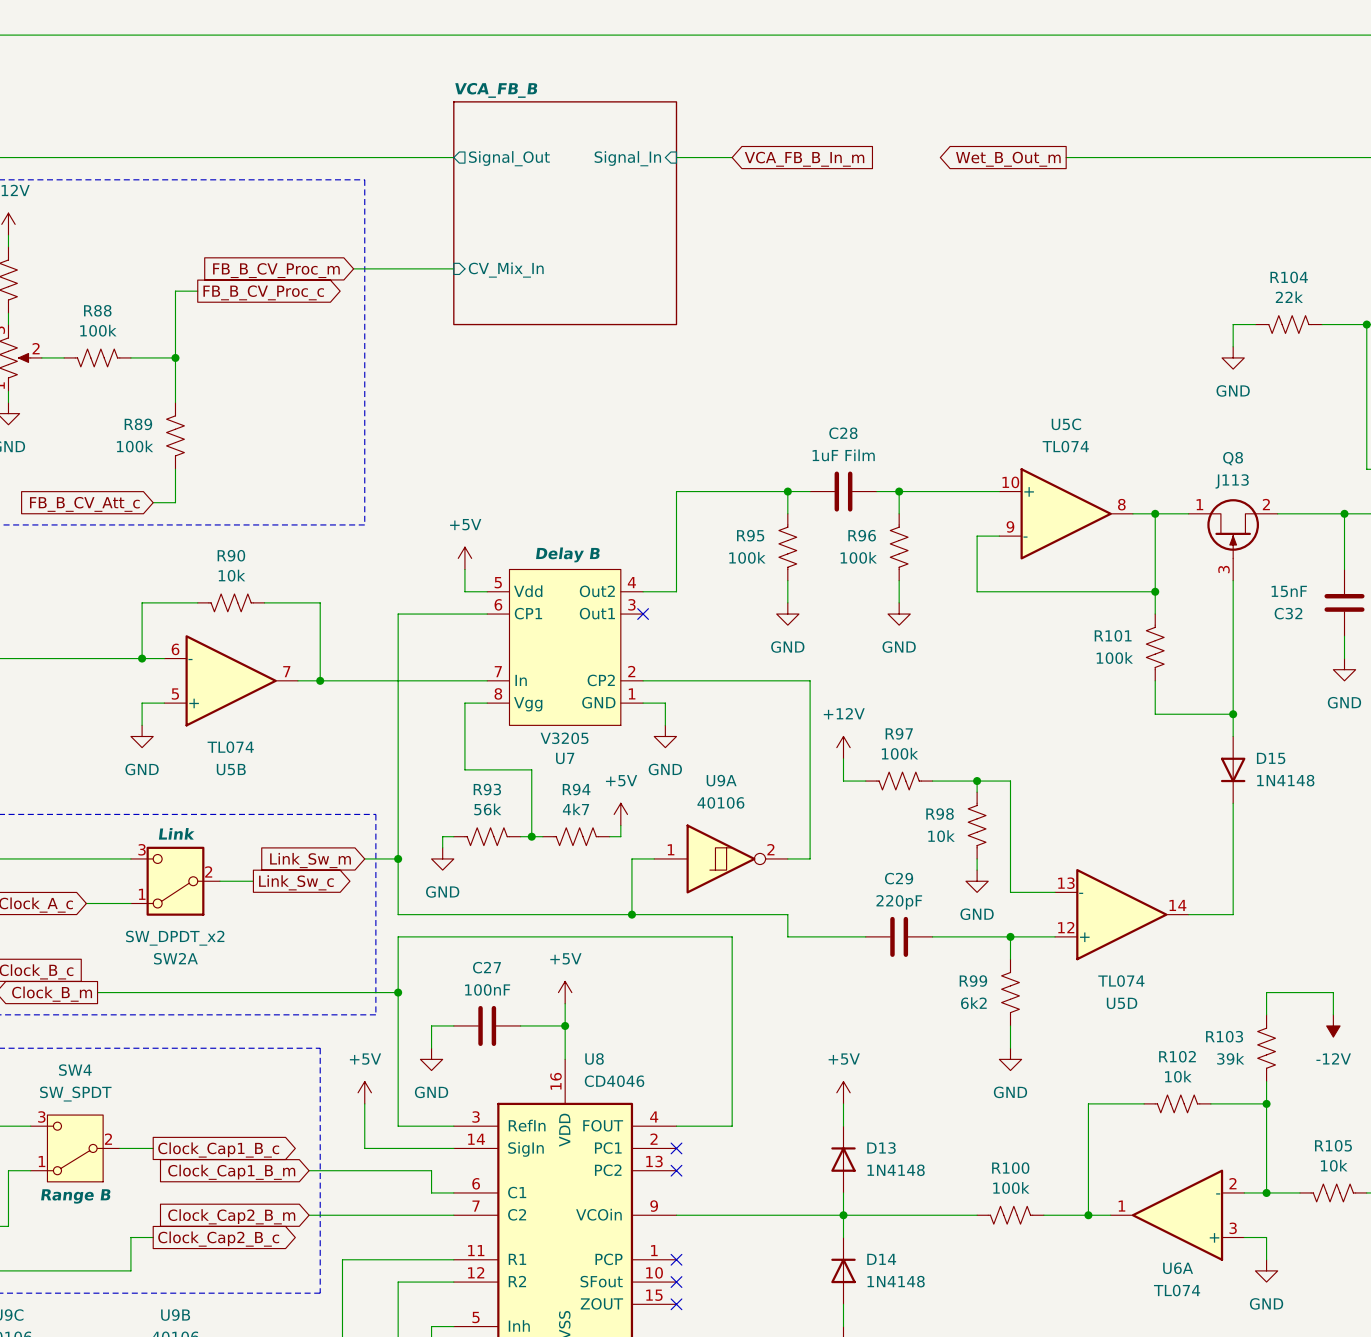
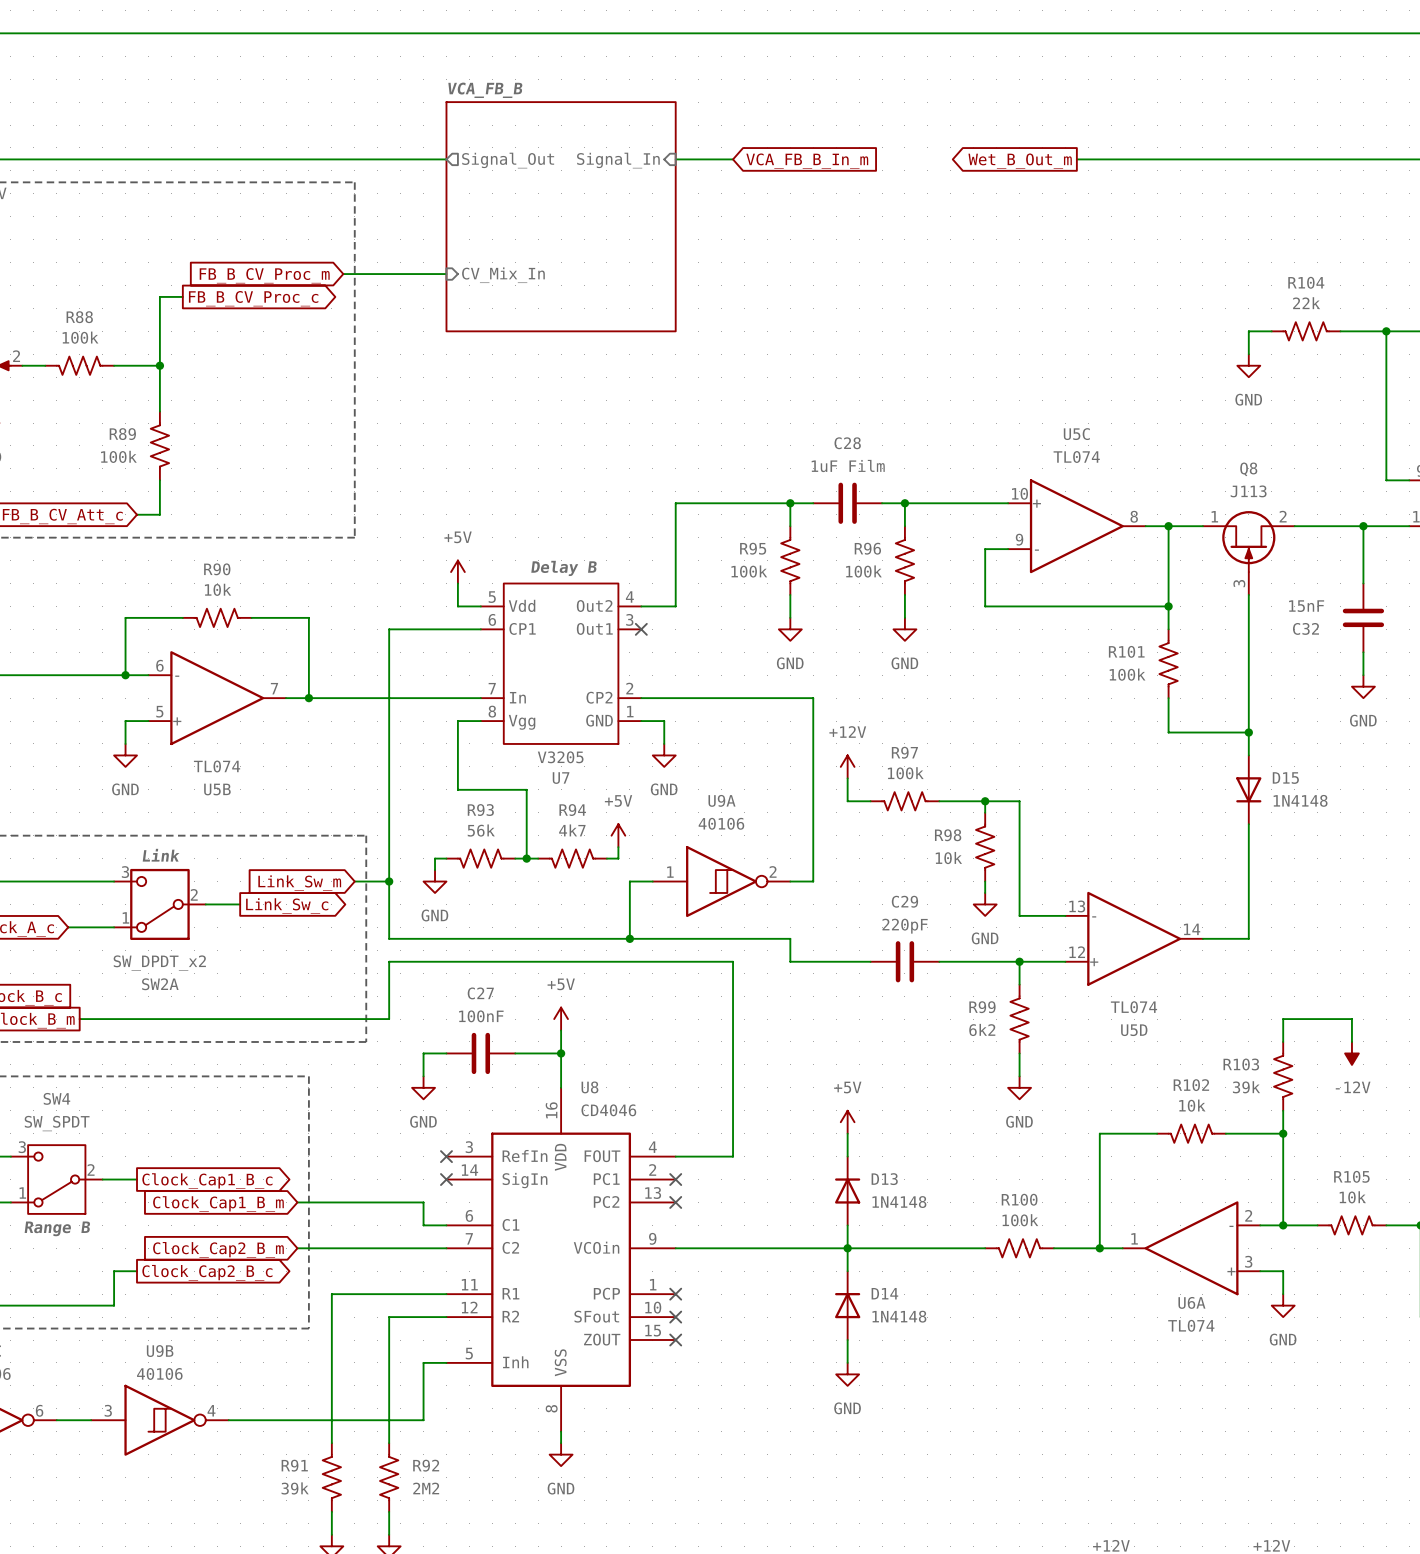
wire: (398, 992) (398, 1126) (453, 1126) -> none
junction: (398, 992) -> none
power symbol: +5V (364, 1092) -> none
wire: (364, 1103) (364, 1148) (453, 1148) -> none
no-connect mark: none -> (446, 1156)
no-connect mark: none -> (446, 1179)

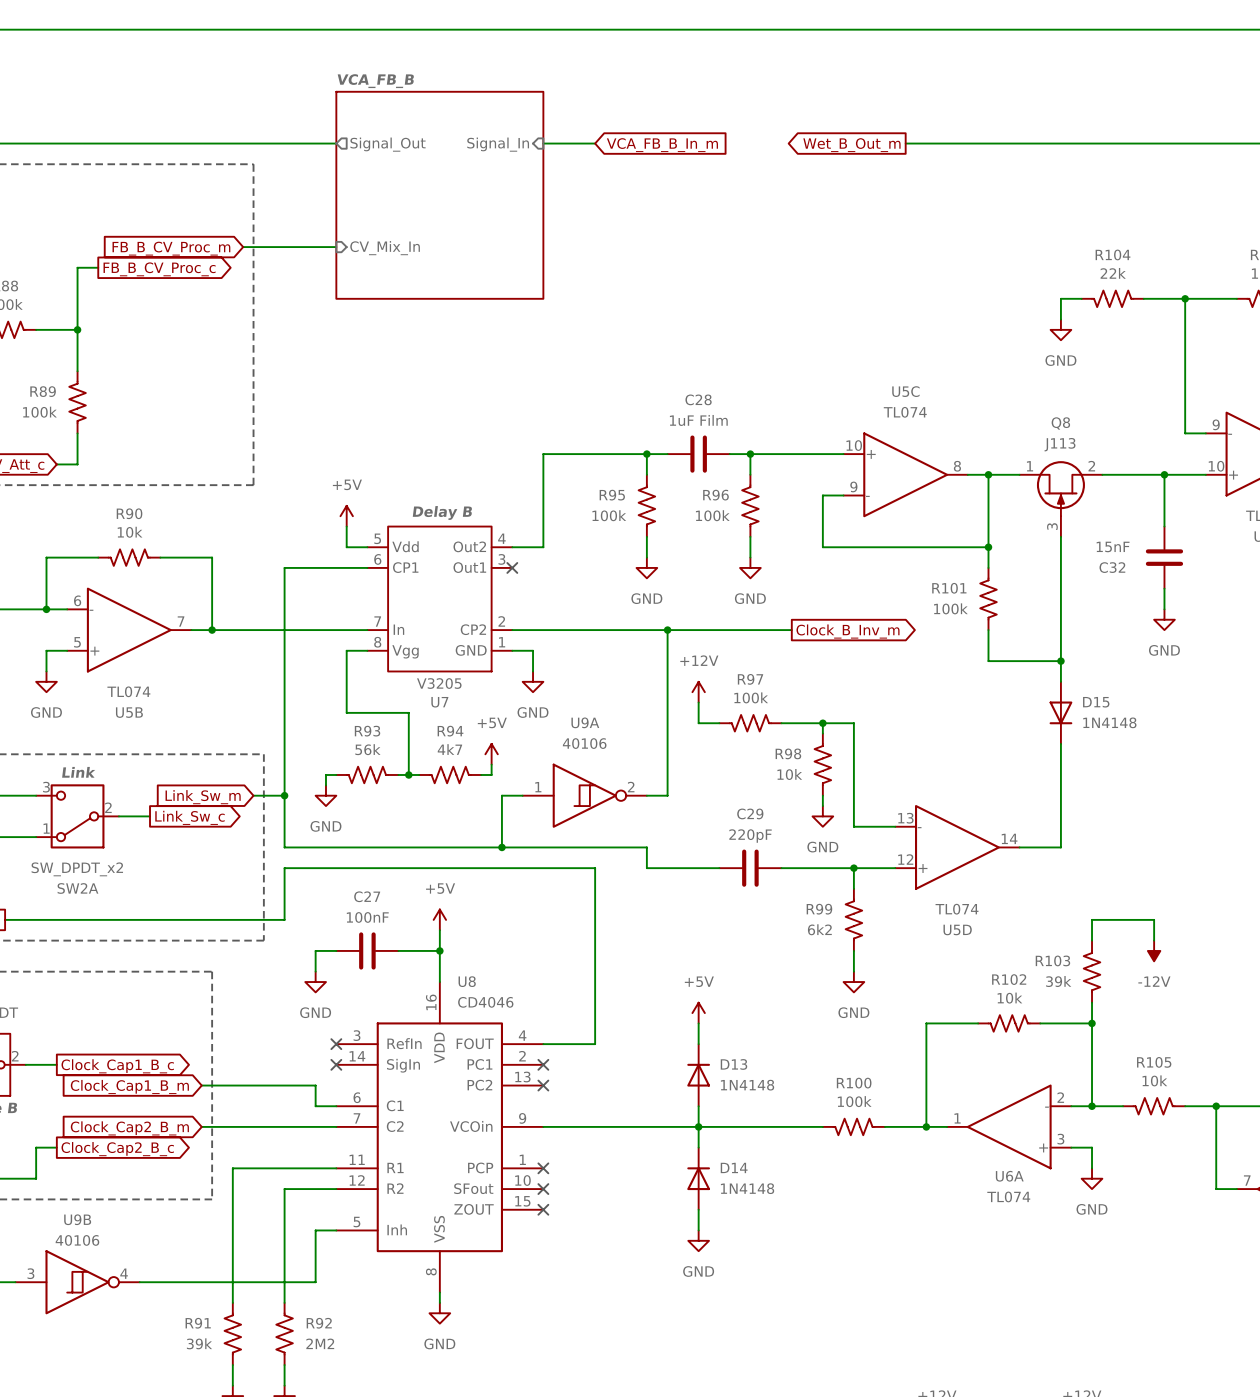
wire: none -> (667, 630) (791, 630)
junction: none -> (667, 630)
global label: none -> Clock_B_Inv_m (848, 631)

